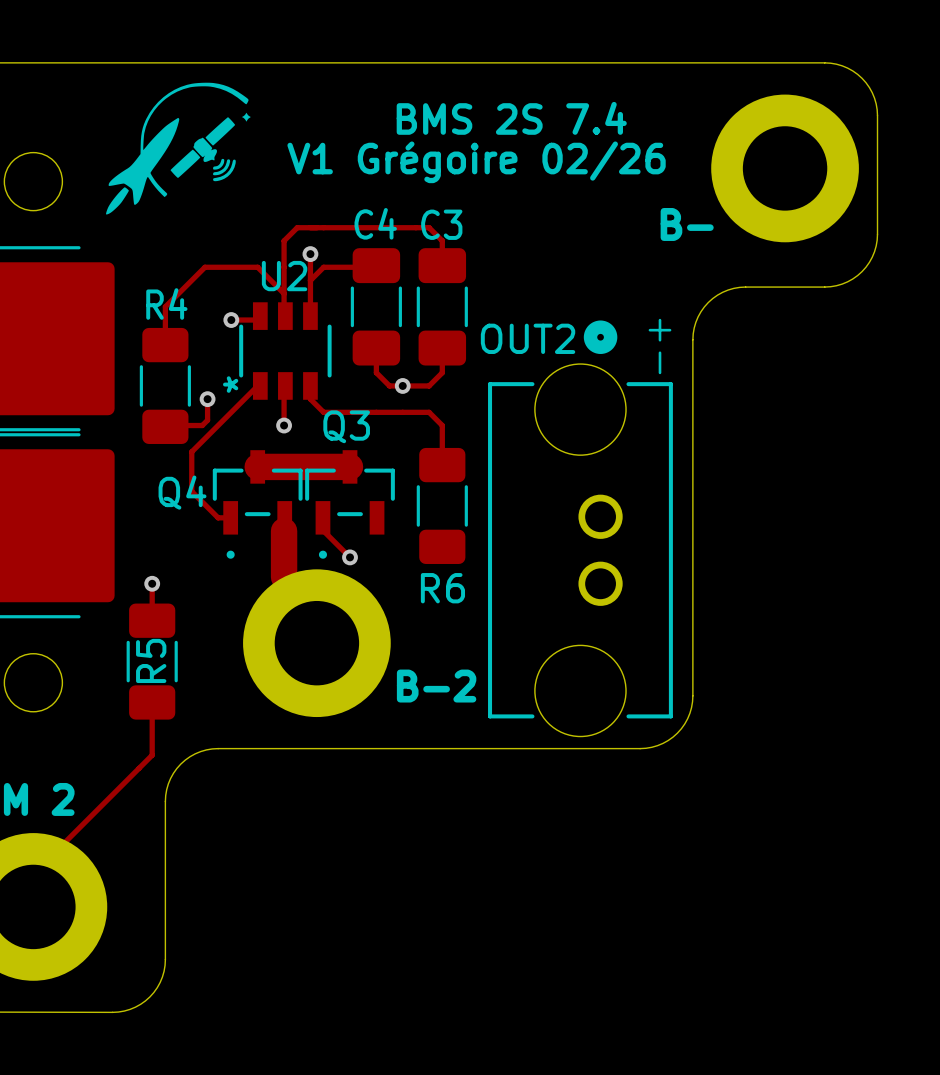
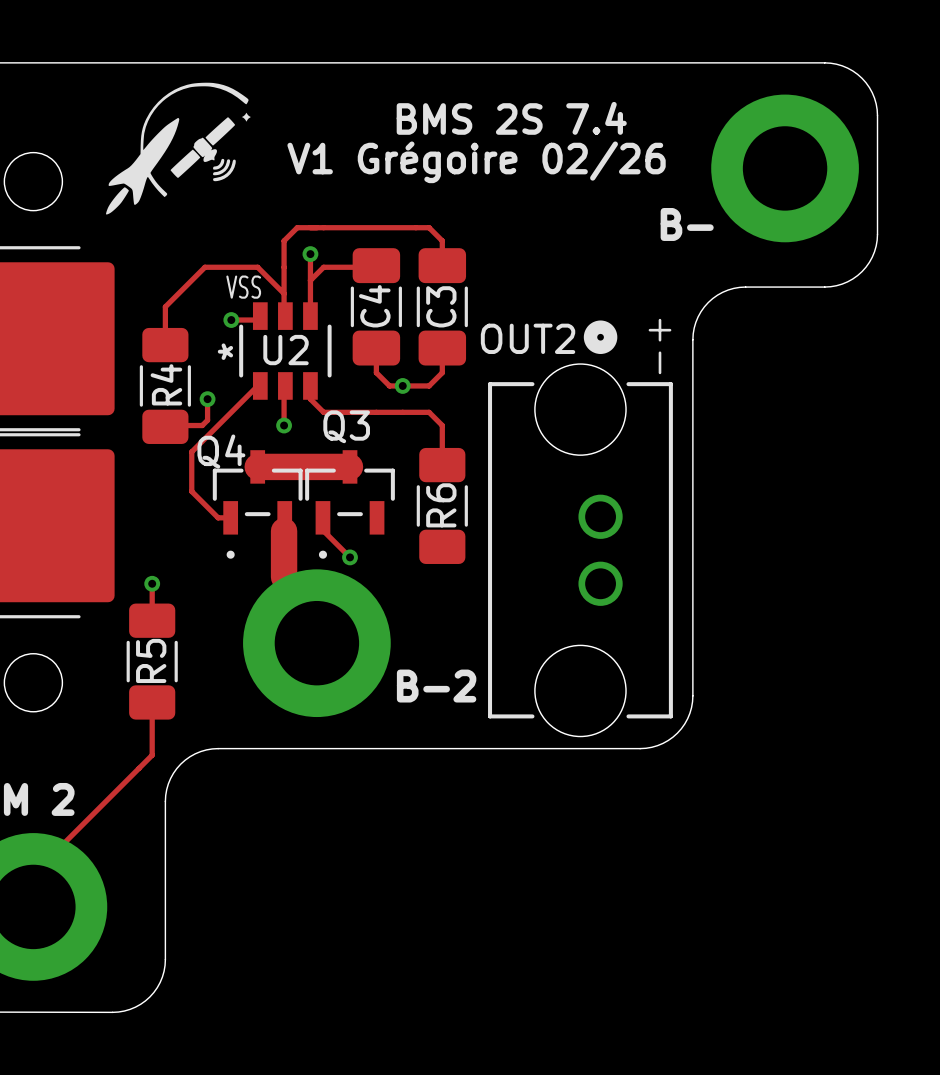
C4 name rotation: 0° (375, 223) -> 90° counterclockwise (374, 306)
C4 name position: C4 (375, 223) -> C4 (374, 306)
C3 name rotation: 0° (441, 224) -> 90° counterclockwise (441, 306)
C3 name position: C3 (441, 224) -> C3 (441, 306)
U2 name position: U2 (284, 276) -> U2 (286, 350)
text: none -> VSS (243, 287)
R4 name rotation: 0° (166, 303) -> 90° counterclockwise (166, 384)
R4 name position: R4 (166, 303) -> R4 (166, 384)
U2 text position: * (230, 384) -> * (225, 351)
Q4 name position: Q4 (182, 492) -> Q4 (221, 451)
R6 name rotation: 0° (442, 588) -> 90° counterclockwise (441, 505)
R6 name position: R6 (442, 588) -> R6 (441, 505)

